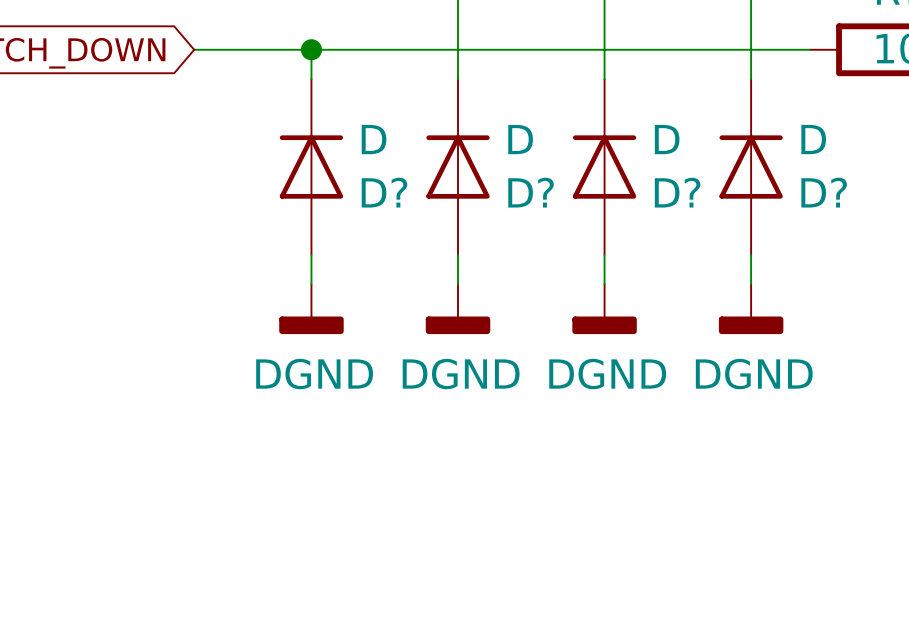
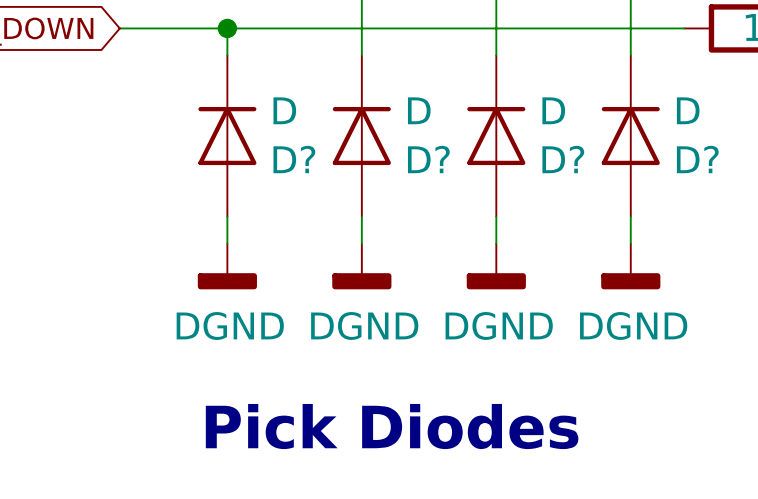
text: none -> Pick Diodes (392, 426)

